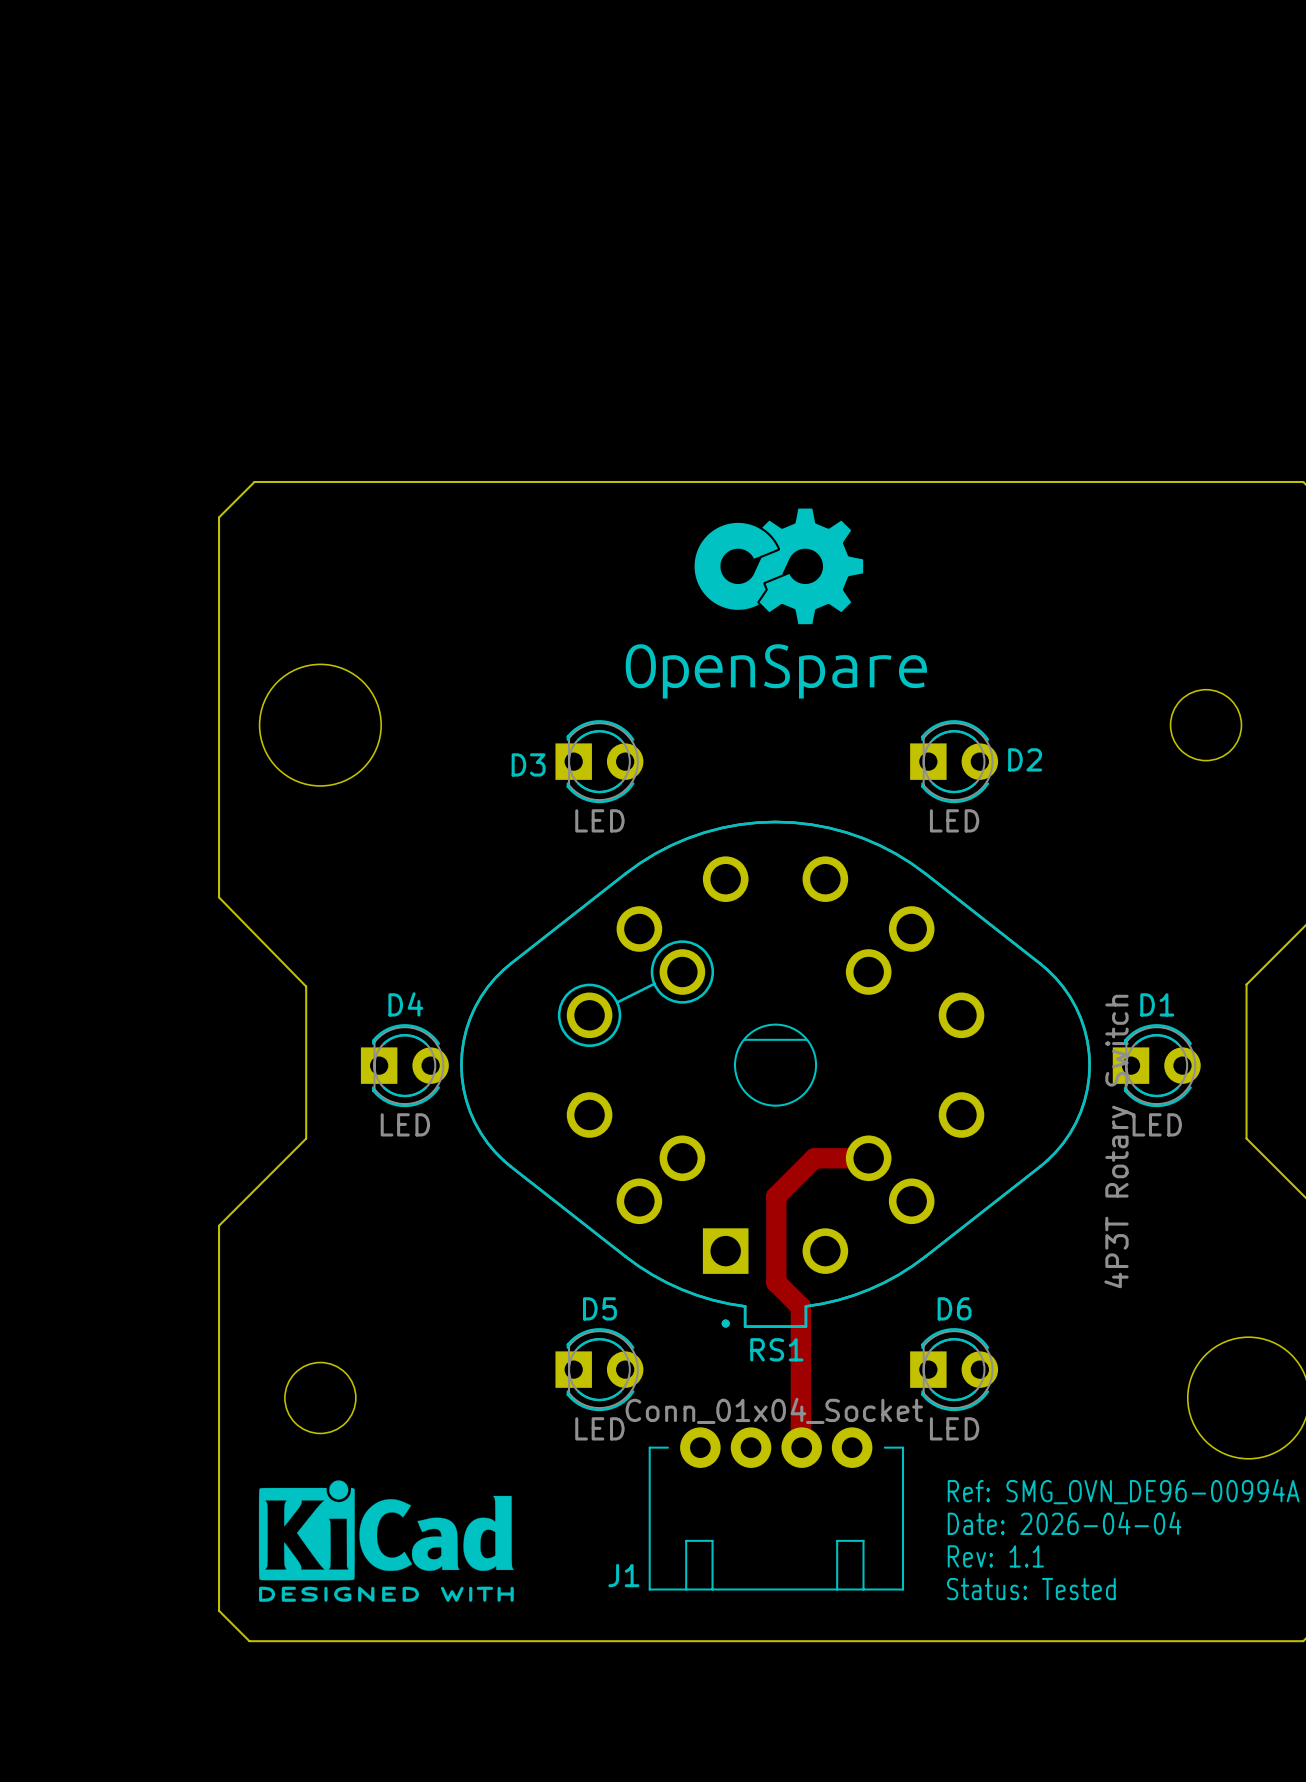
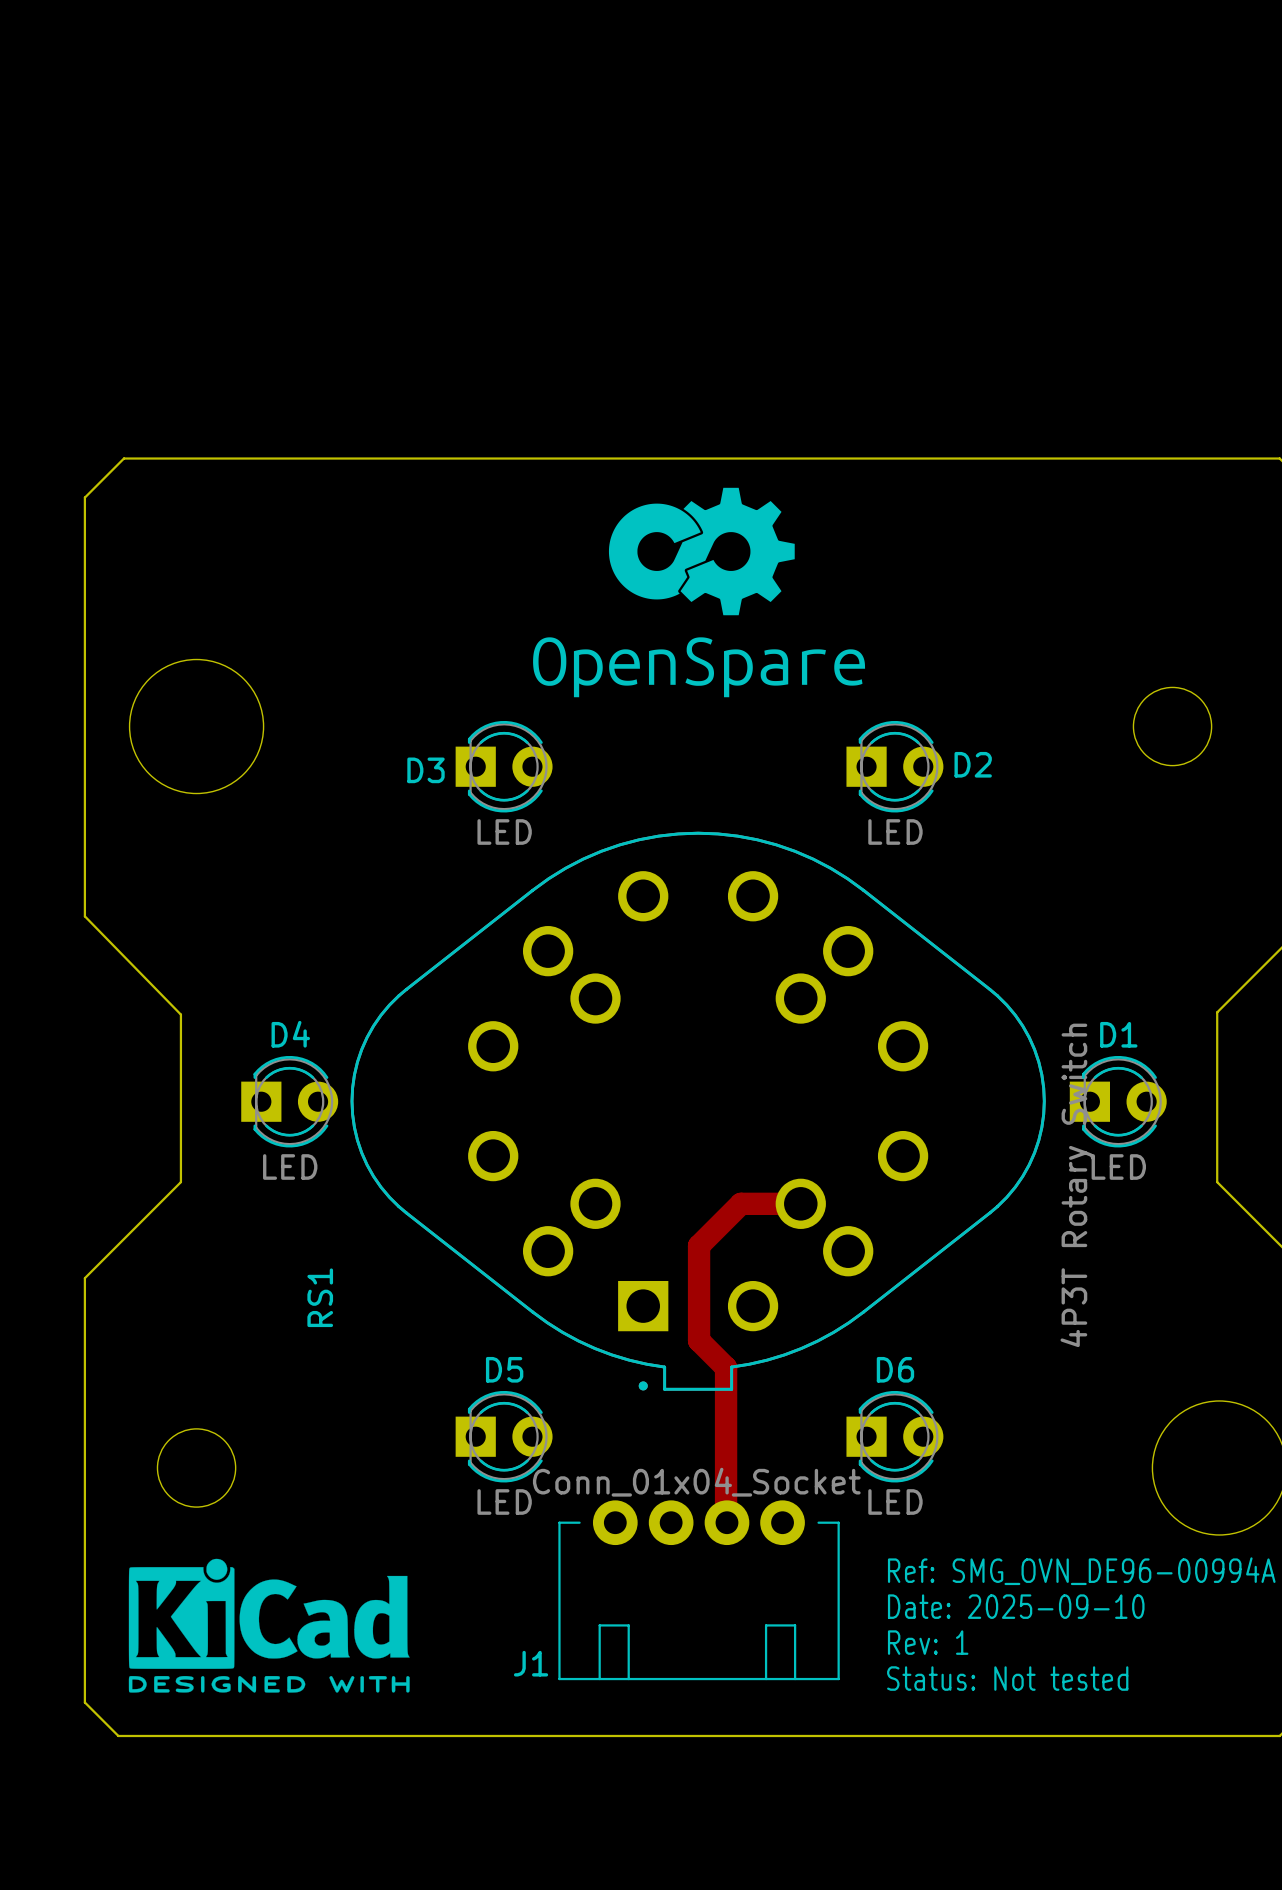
RS1 footprint: [460, 820, 1091, 1328] -> [350, 831, 1046, 1391]
RS1 name position: RS1 (776, 1349) -> RS1 (320, 1297)
text: Date: 2026-04-04 (1064, 1523) -> Date: 2025-09-10 (1016, 1606)
text: Rev: 1.1 (995, 1556) -> Rev: 1 (928, 1642)
text: Status: Tested (1031, 1589) -> Status: Not tested (1007, 1678)

